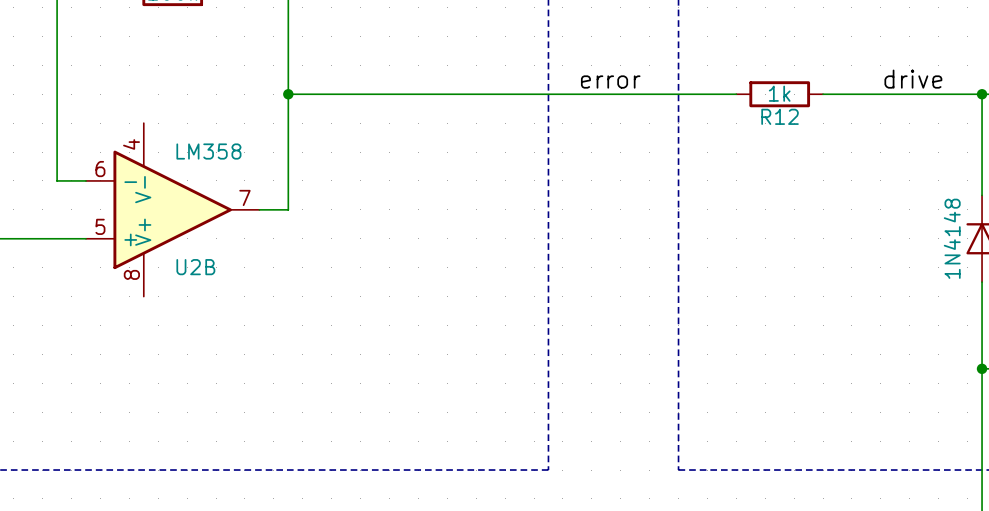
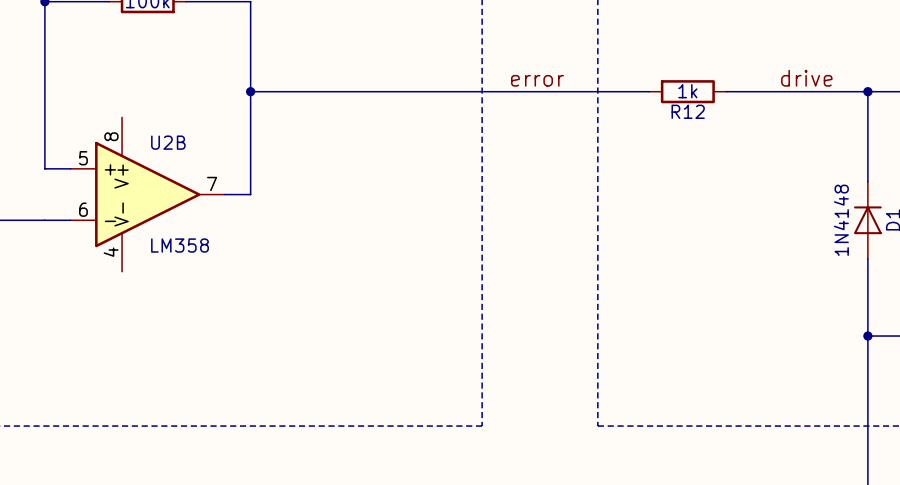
U2B flip: as is (172, 209) -> up-down (147, 194)

